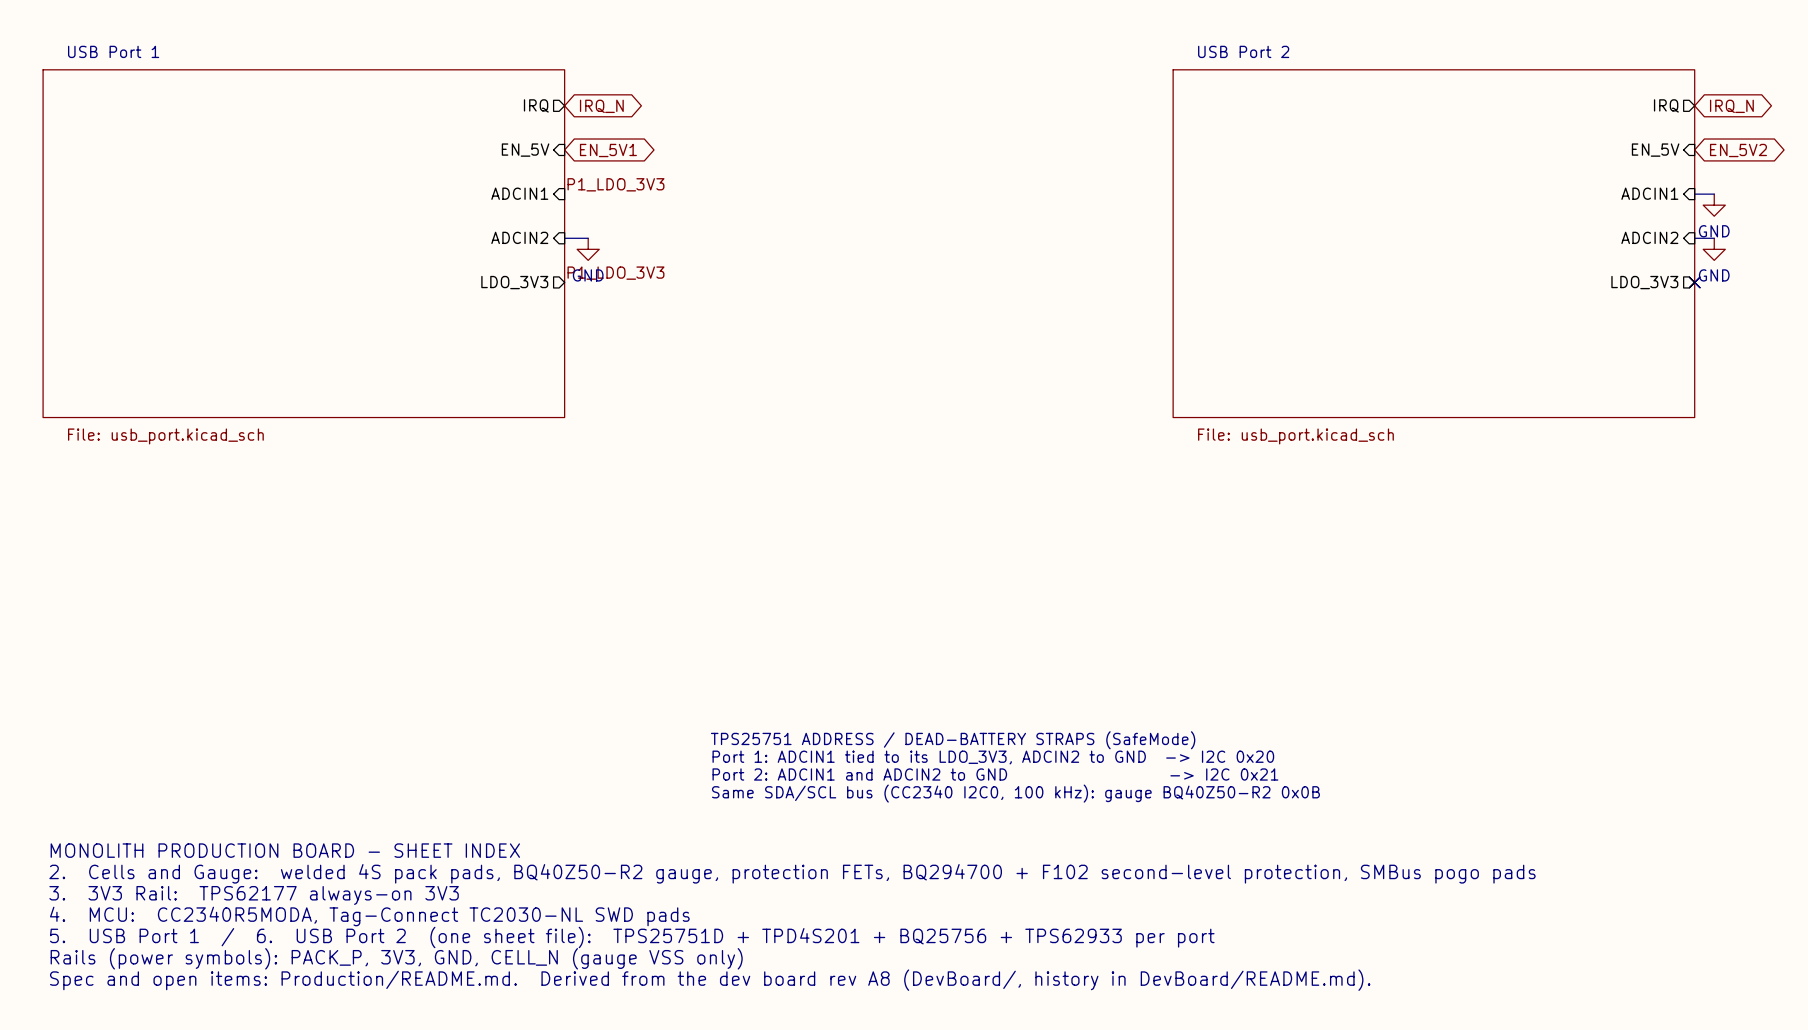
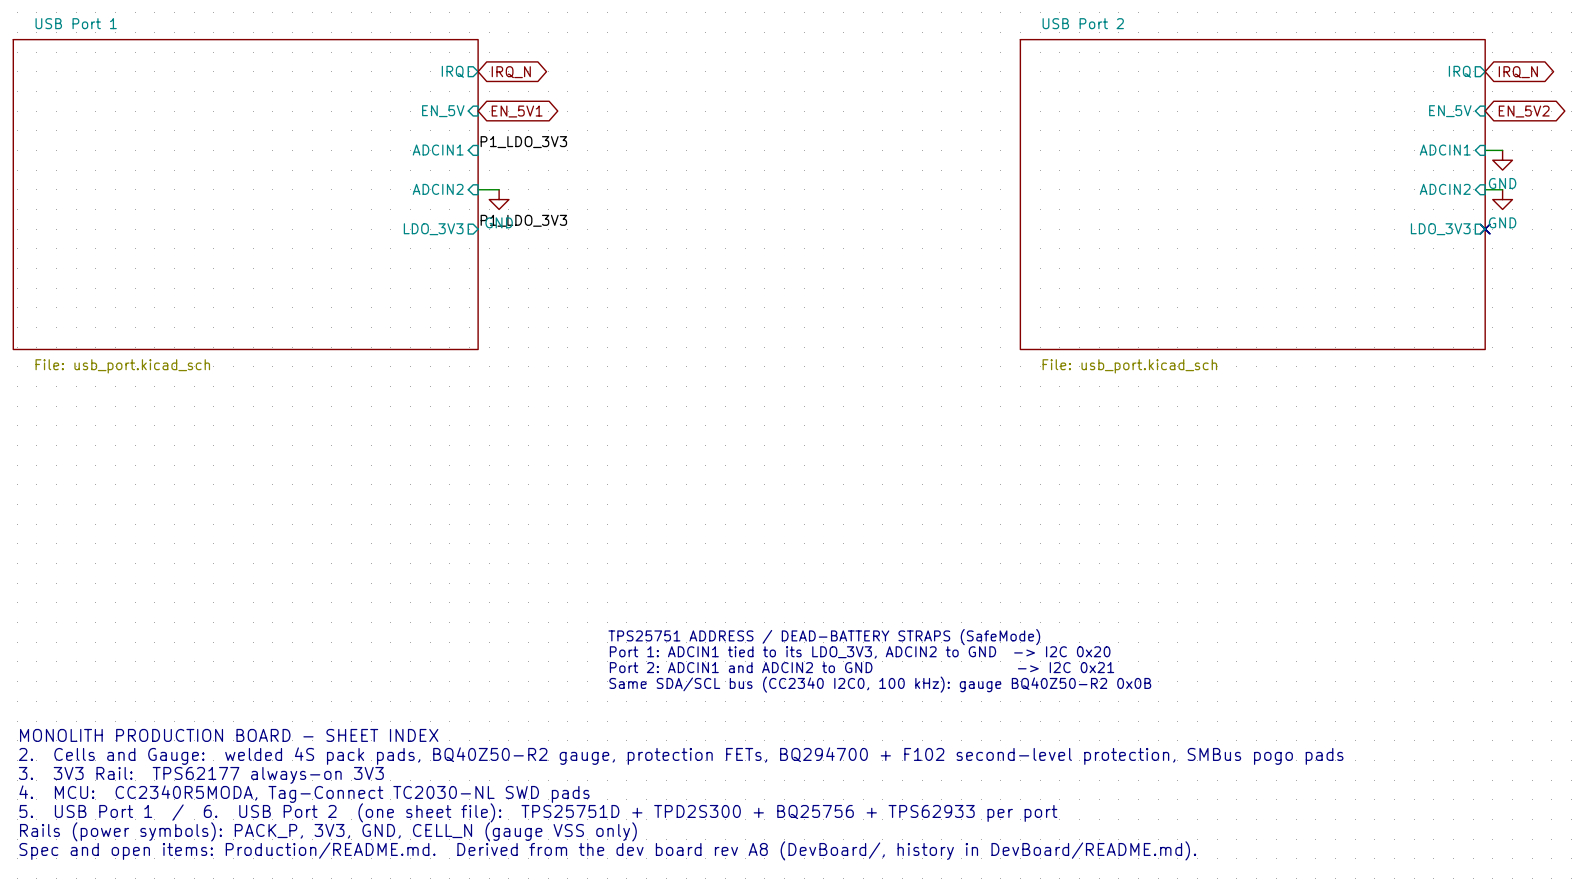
text: 5. USB Port 1 / 6. USB Port 2 (one sheet file): TPS25751D + TPD4S201 + BQ25756 + TPS62933 per port (632, 937) -> 5. USB Port 1 / 6. USB Port 2 (one sheet file): TPS25751D + TPD2S300 + BQ25756 + TPS62933 per port (538, 812)

